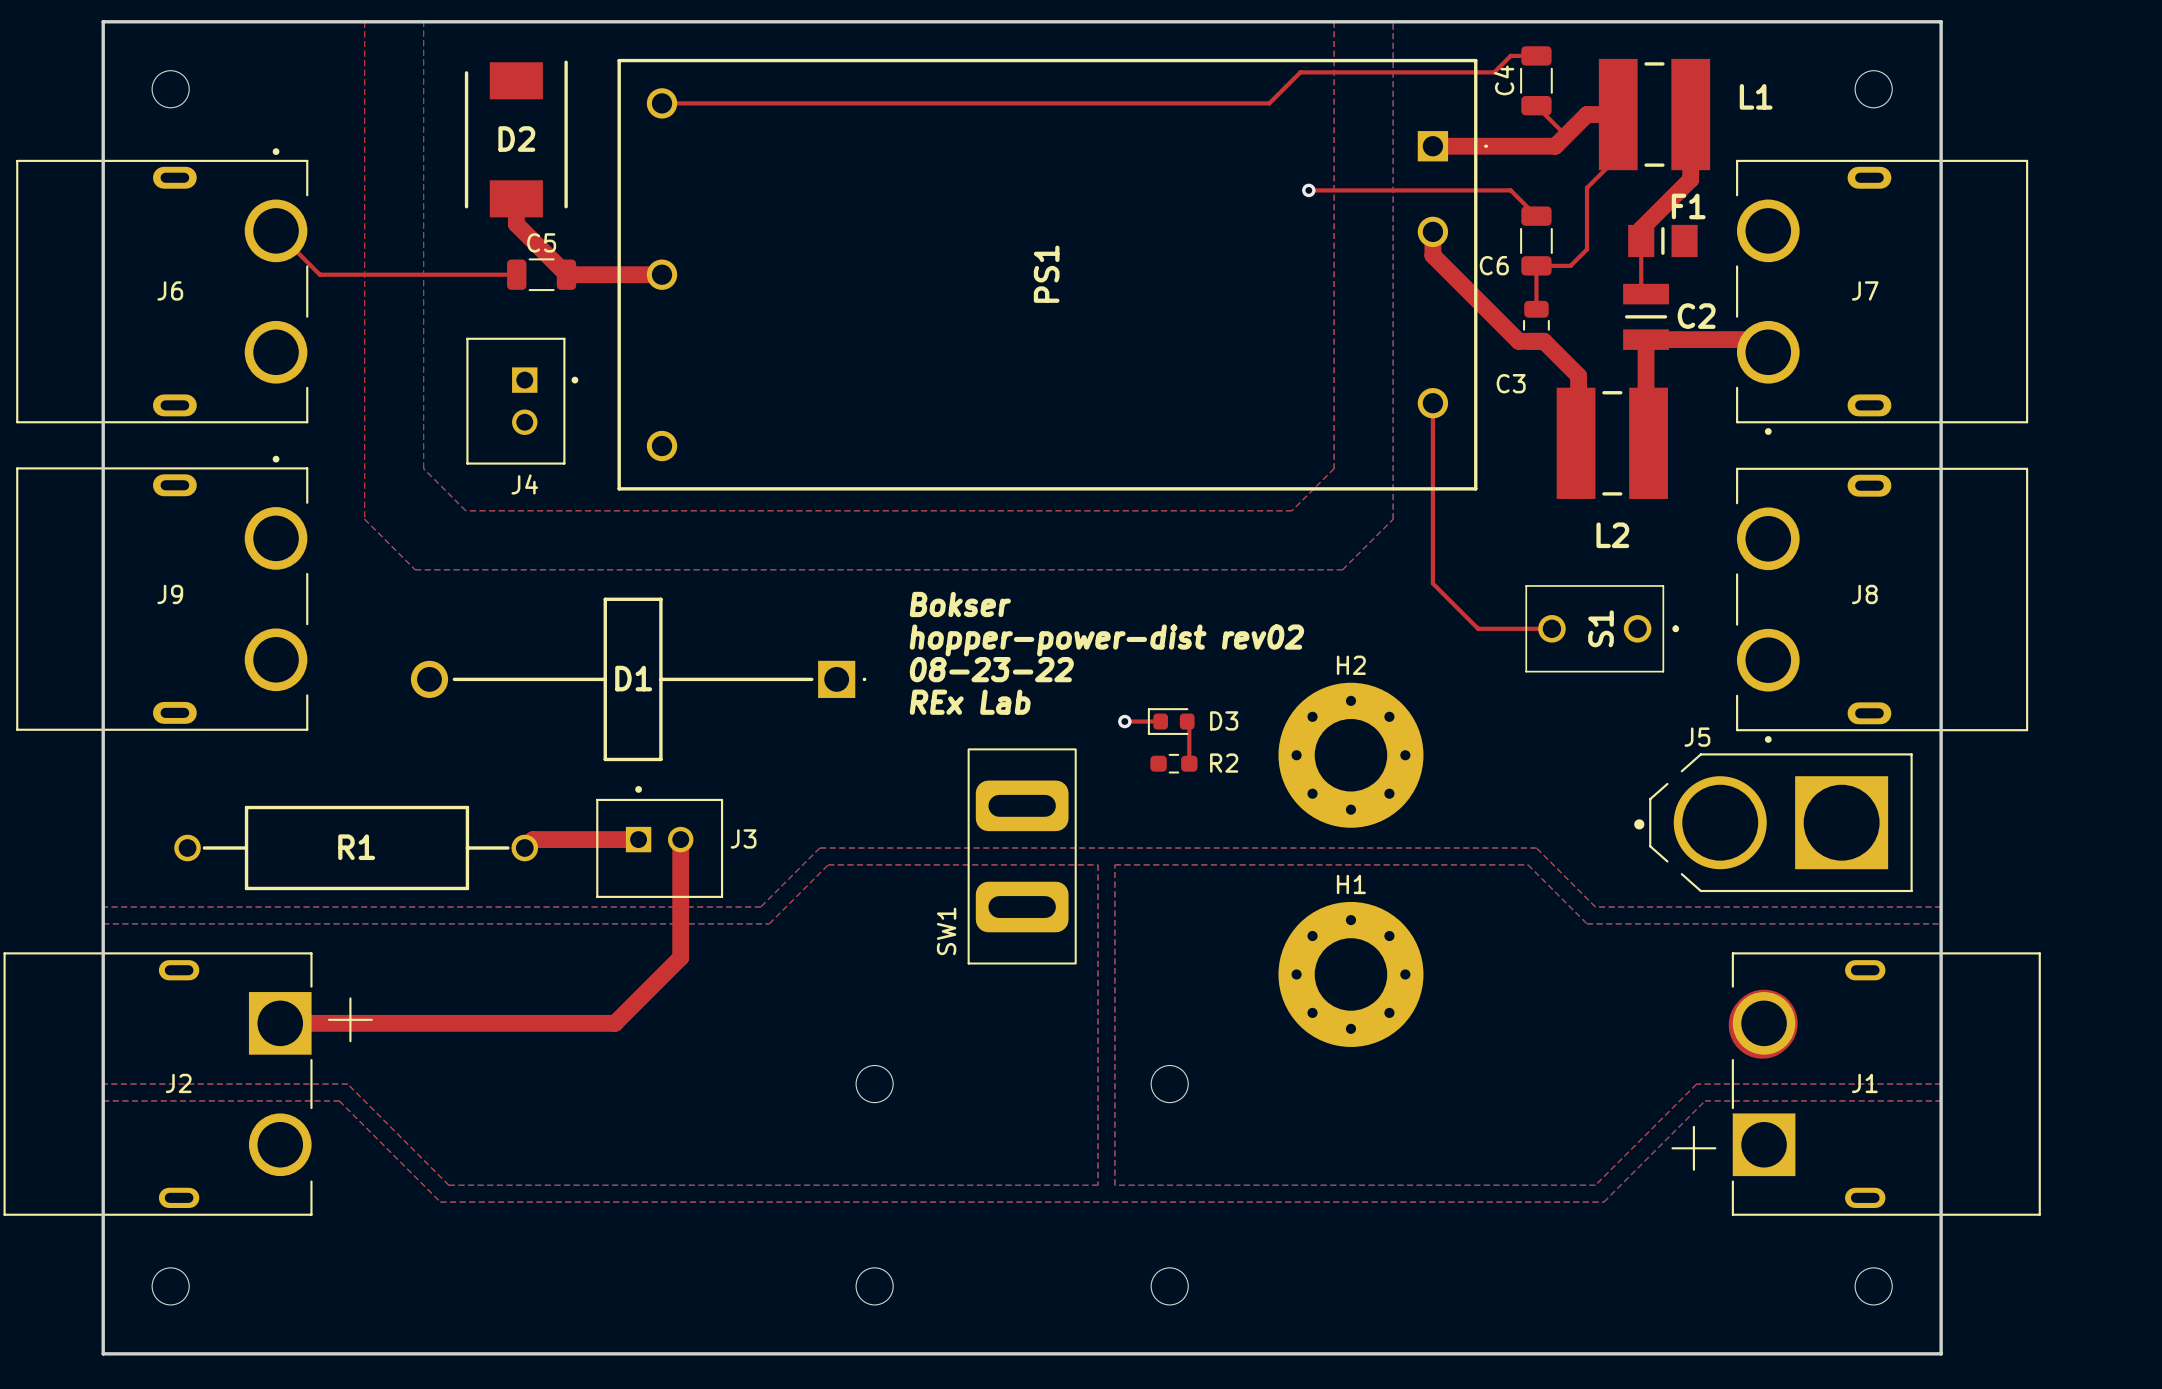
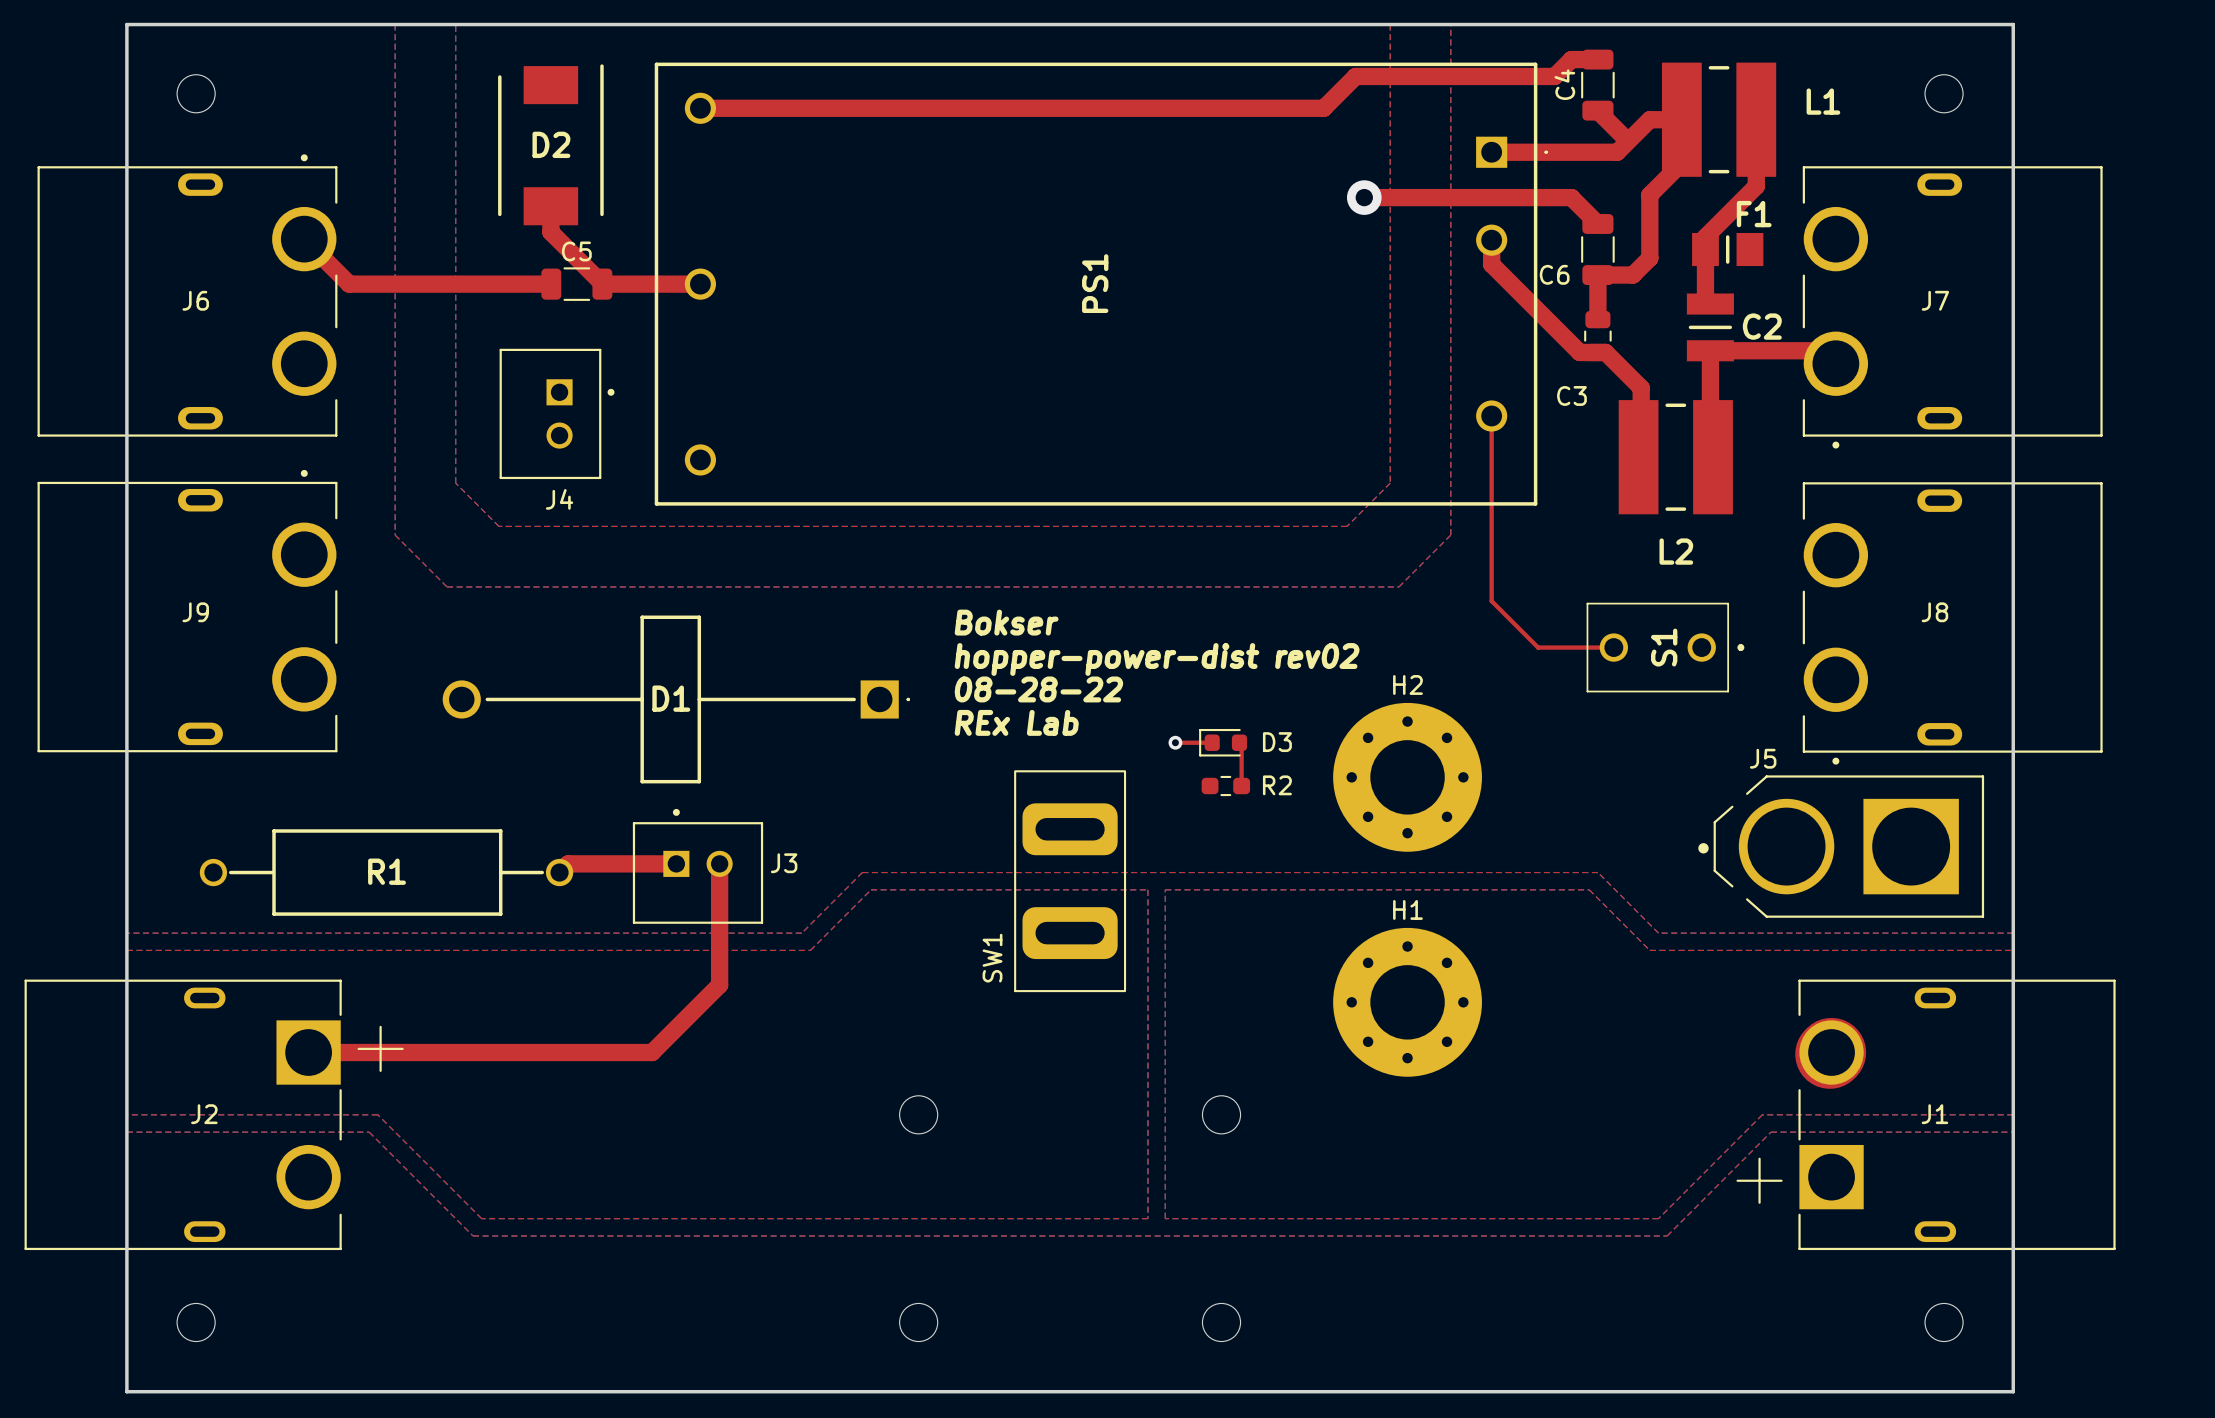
top track width: thin (1536, 55) (1510, 55) (1494, 72) (1300, 72) (1269, 103) (662, 103) -> thick (1597, 59) (1571, 59) (1554, 76) (1355, 76) (1323, 108) (700, 108)
top track width: thin (1536, 106) (1561, 131) -> thick (1597, 111) (1623, 137)
top track width: thin (1620, 114) (1620, 154) (1587, 187) (1587, 249) (1570, 265) (1536, 265) (1536, 309) -> thick (1684, 119) (1684, 160) (1649, 195) (1649, 258) (1632, 275) (1597, 275) (1597, 319)
via size: [1302, 183, 1316, 198] -> [1346, 180, 1382, 215]
top track width: thin (1308, 190) (1510, 190) (1536, 216) -> thick (1364, 197) (1571, 197) (1597, 223)
top track width: thin (276, 230) (319, 274) (516, 274) -> thick (304, 239) (349, 284) (551, 284)
top track width: thin (1641, 240) (1641, 289) -> thick (1705, 249) (1705, 299)
text: 08-23-22 (991, 669) -> 08-28-22 (1038, 689)

